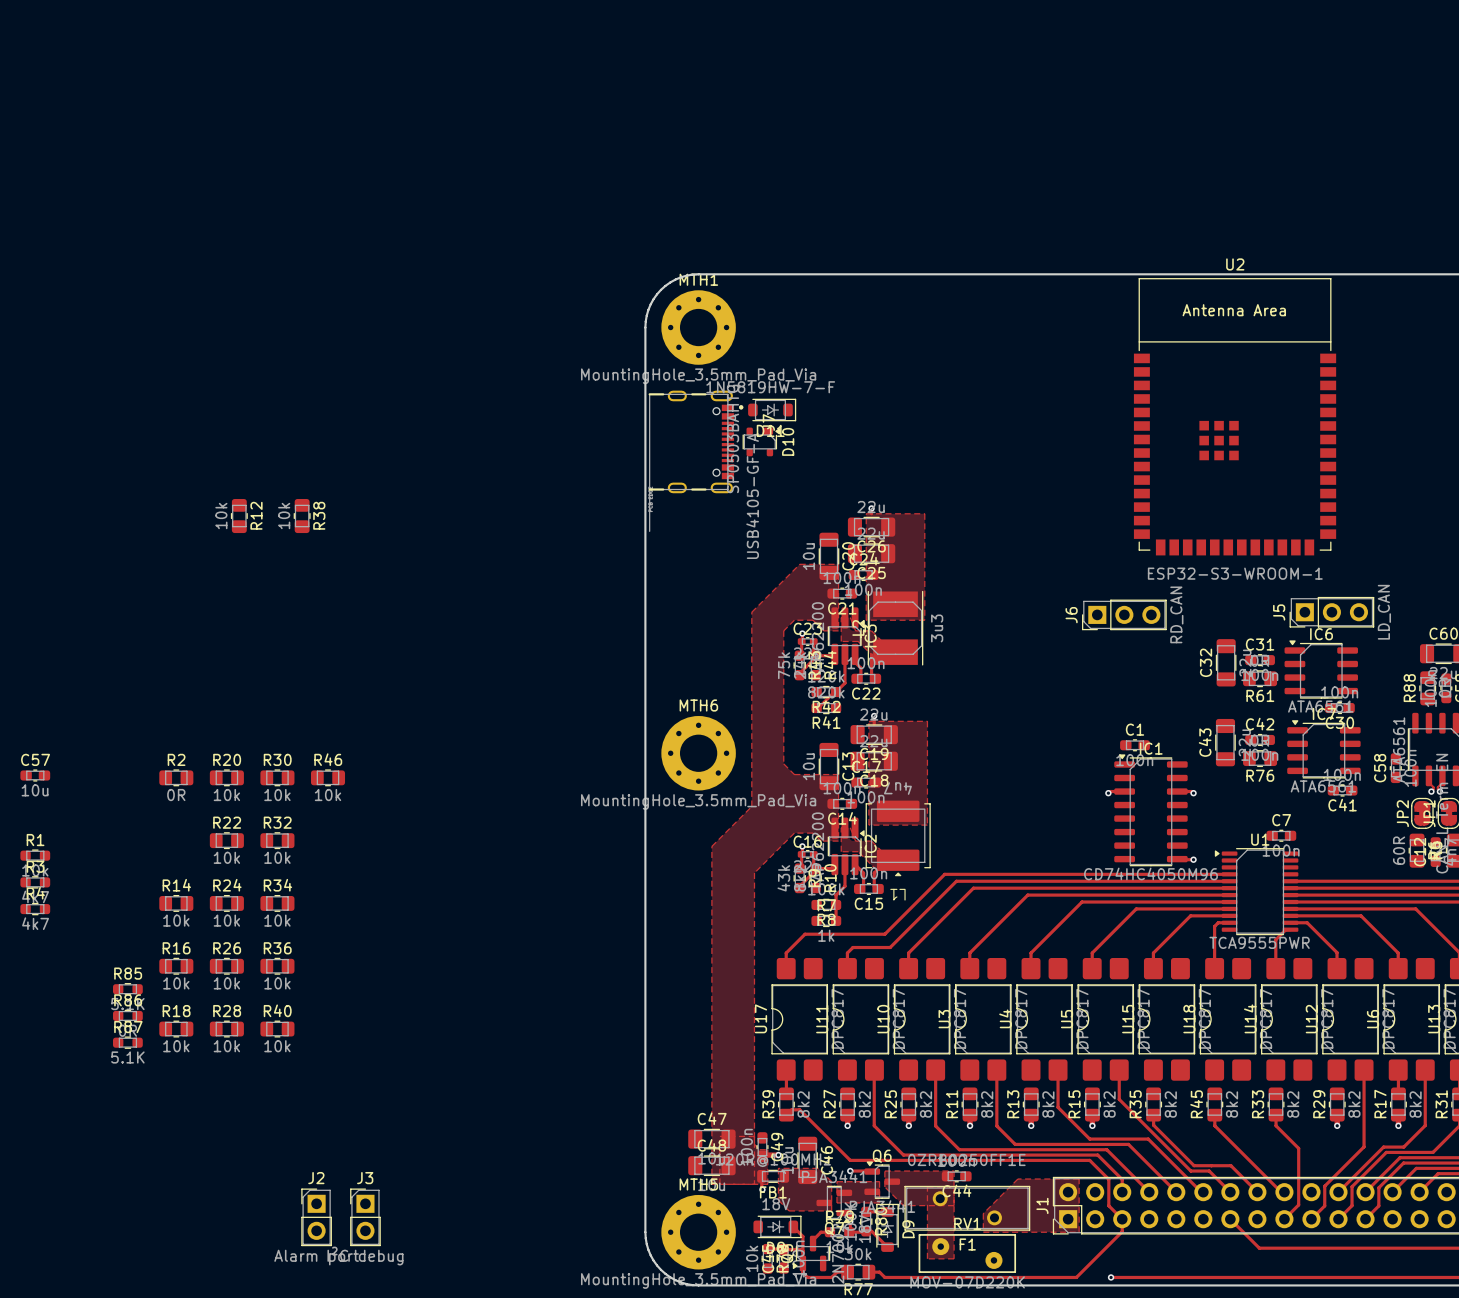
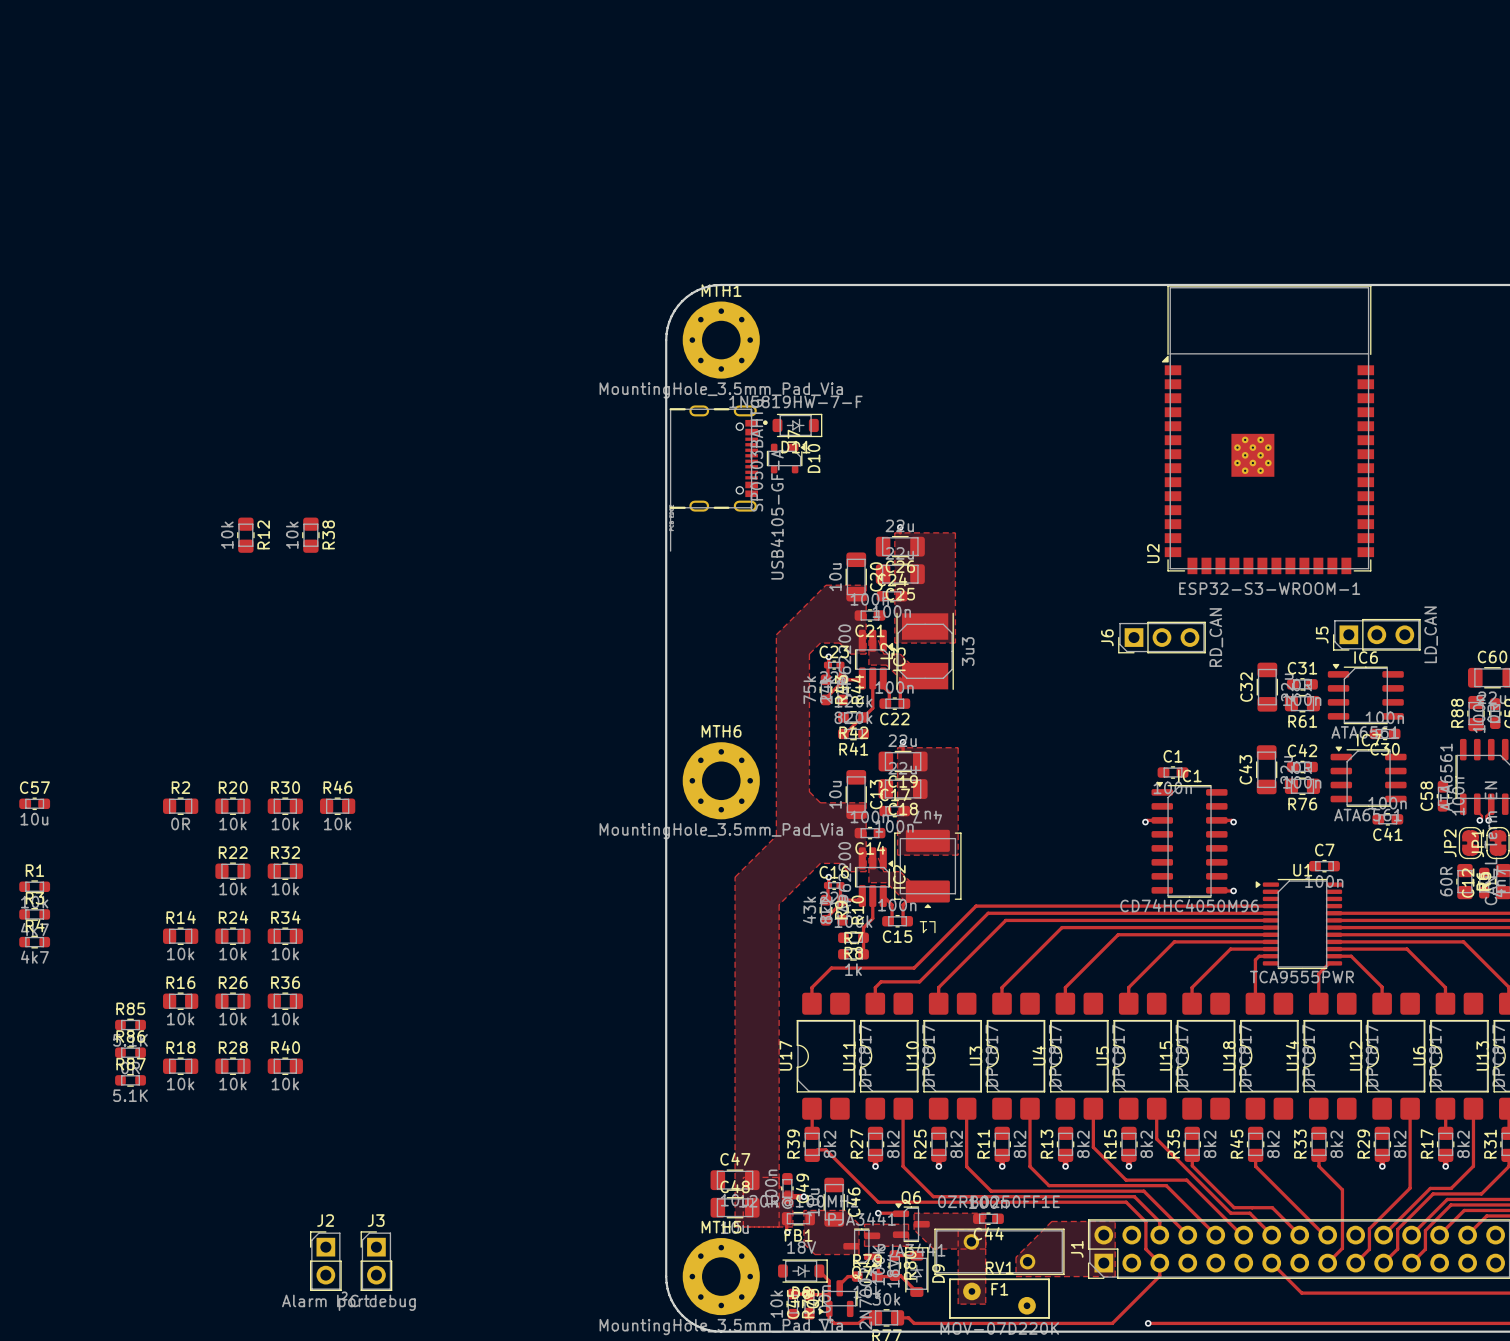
U2 name position: U2 (1235, 264) -> U2 (1153, 553)
U2 footprint: [1133, 278, 1337, 556] -> [1161, 285, 1375, 575]

